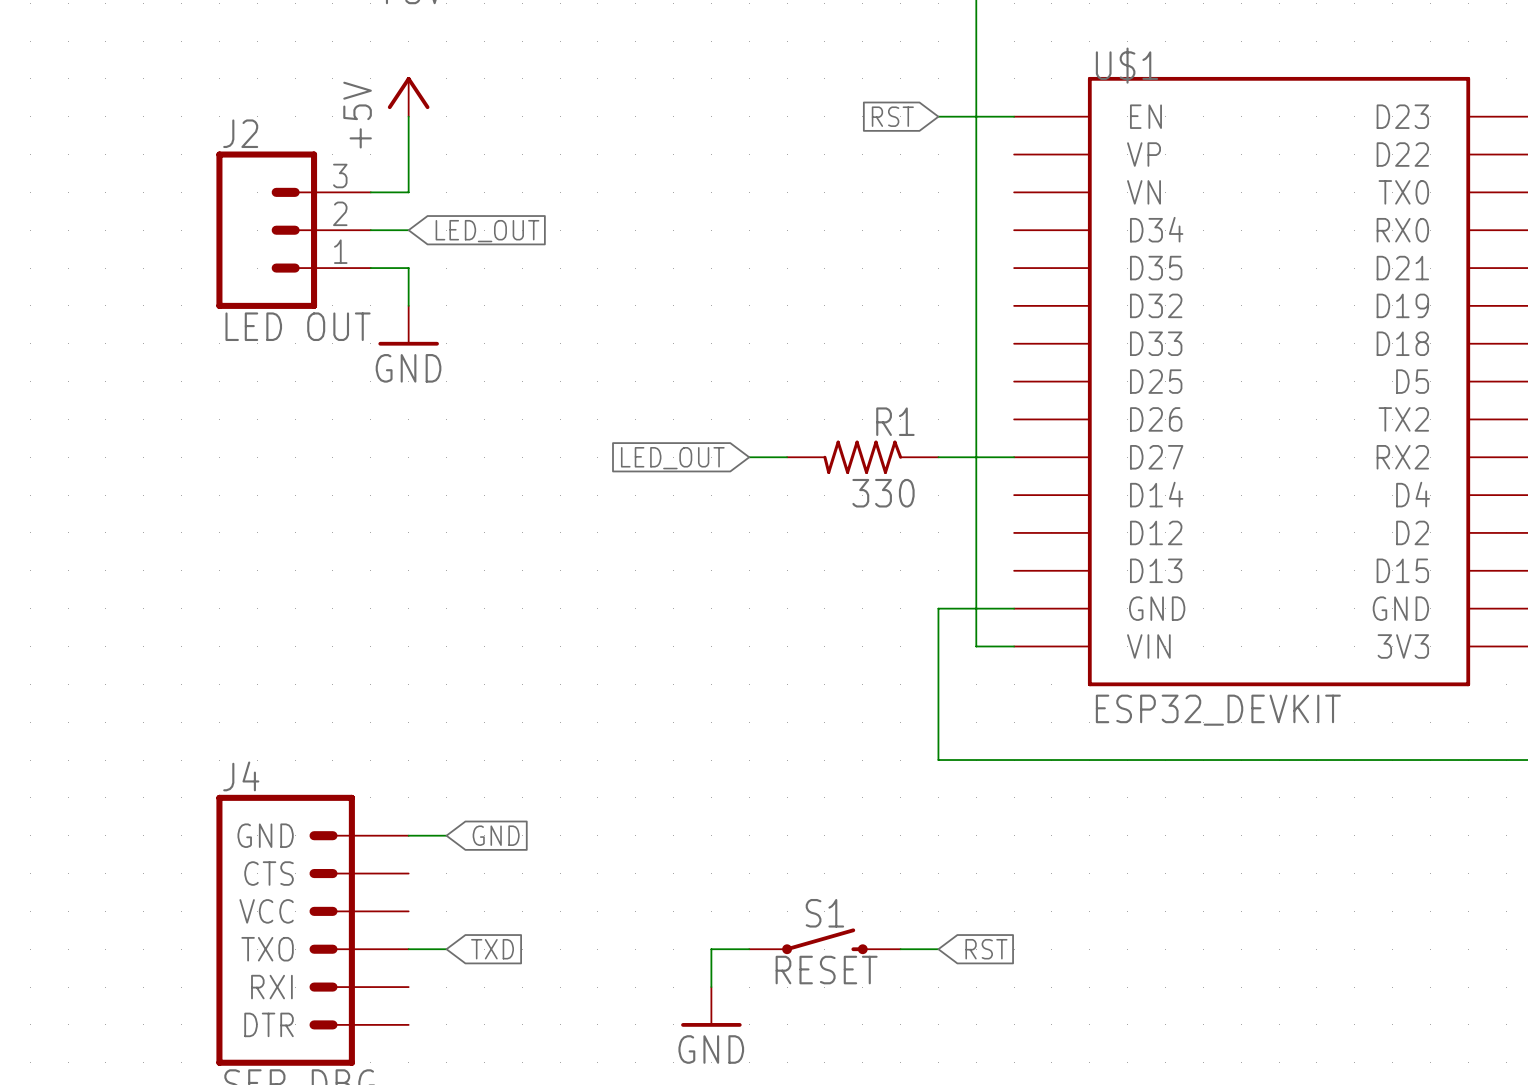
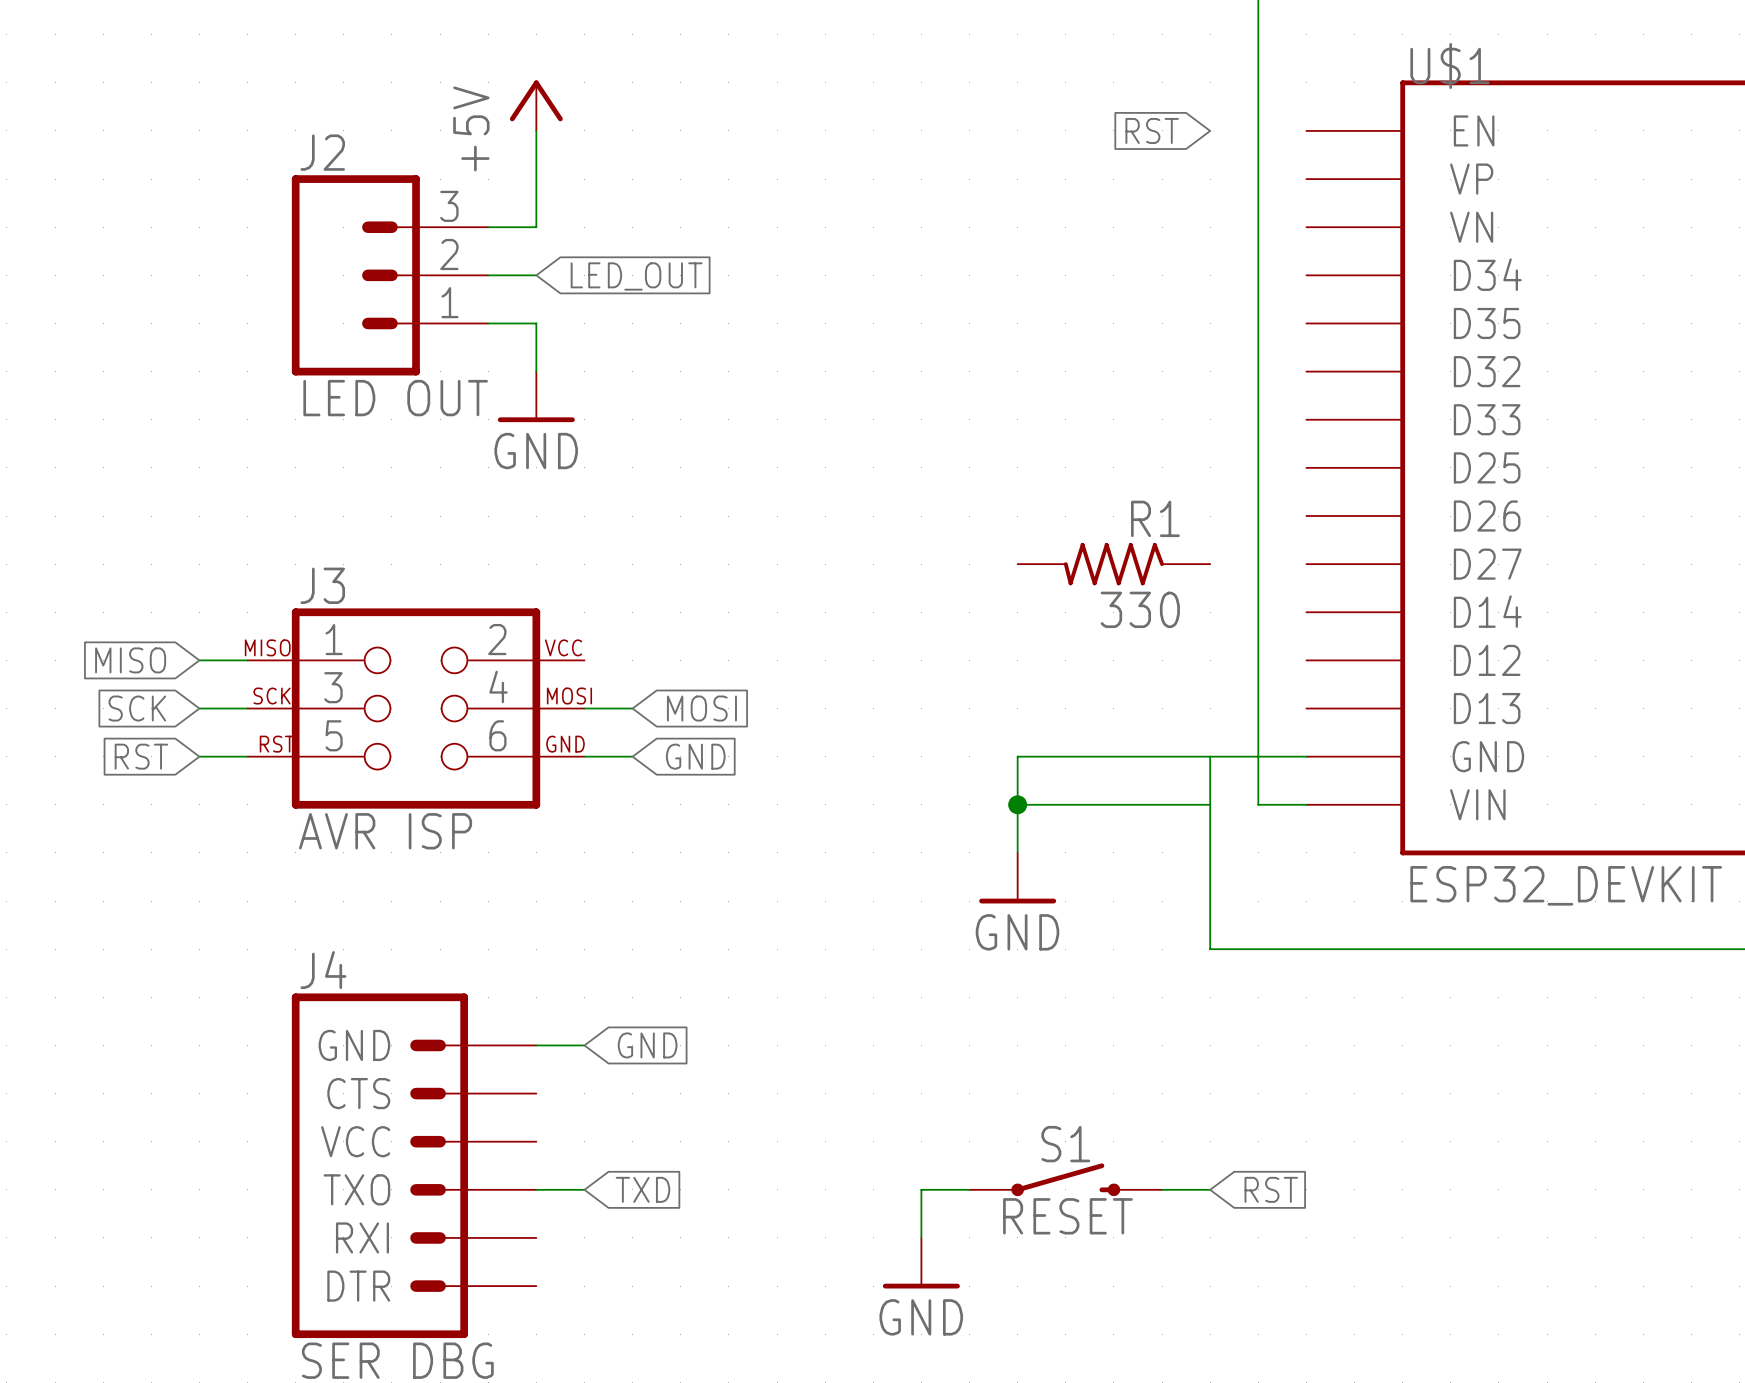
wire: (938, 116) (1014, 116) -> none
wire: (749, 457) (787, 457) -> (584, 708) (632, 708)
wire: (938, 457) (1014, 457) -> none
global label: LED_OUT (672, 458) -> none
global label: none -> MISO (130, 660)
wire: none -> (199, 660) (247, 660)
global label: none -> SCK (137, 708)
wire: none -> (199, 708) (247, 708)
J3: none -> AVR ISP (416, 708)
global label: none -> MOSI (701, 708)
global label: none -> RST (141, 756)
wire: none -> (199, 756) (247, 756)
wire: none -> (584, 756) (632, 756)
global label: none -> GND (695, 756)
wire: none -> (1210, 756) (1017, 756) (1017, 852)
wire: none -> (1017, 804) (1210, 804)
junction: none -> (1017, 804)
power symbol: none -> GND (1017, 878)

